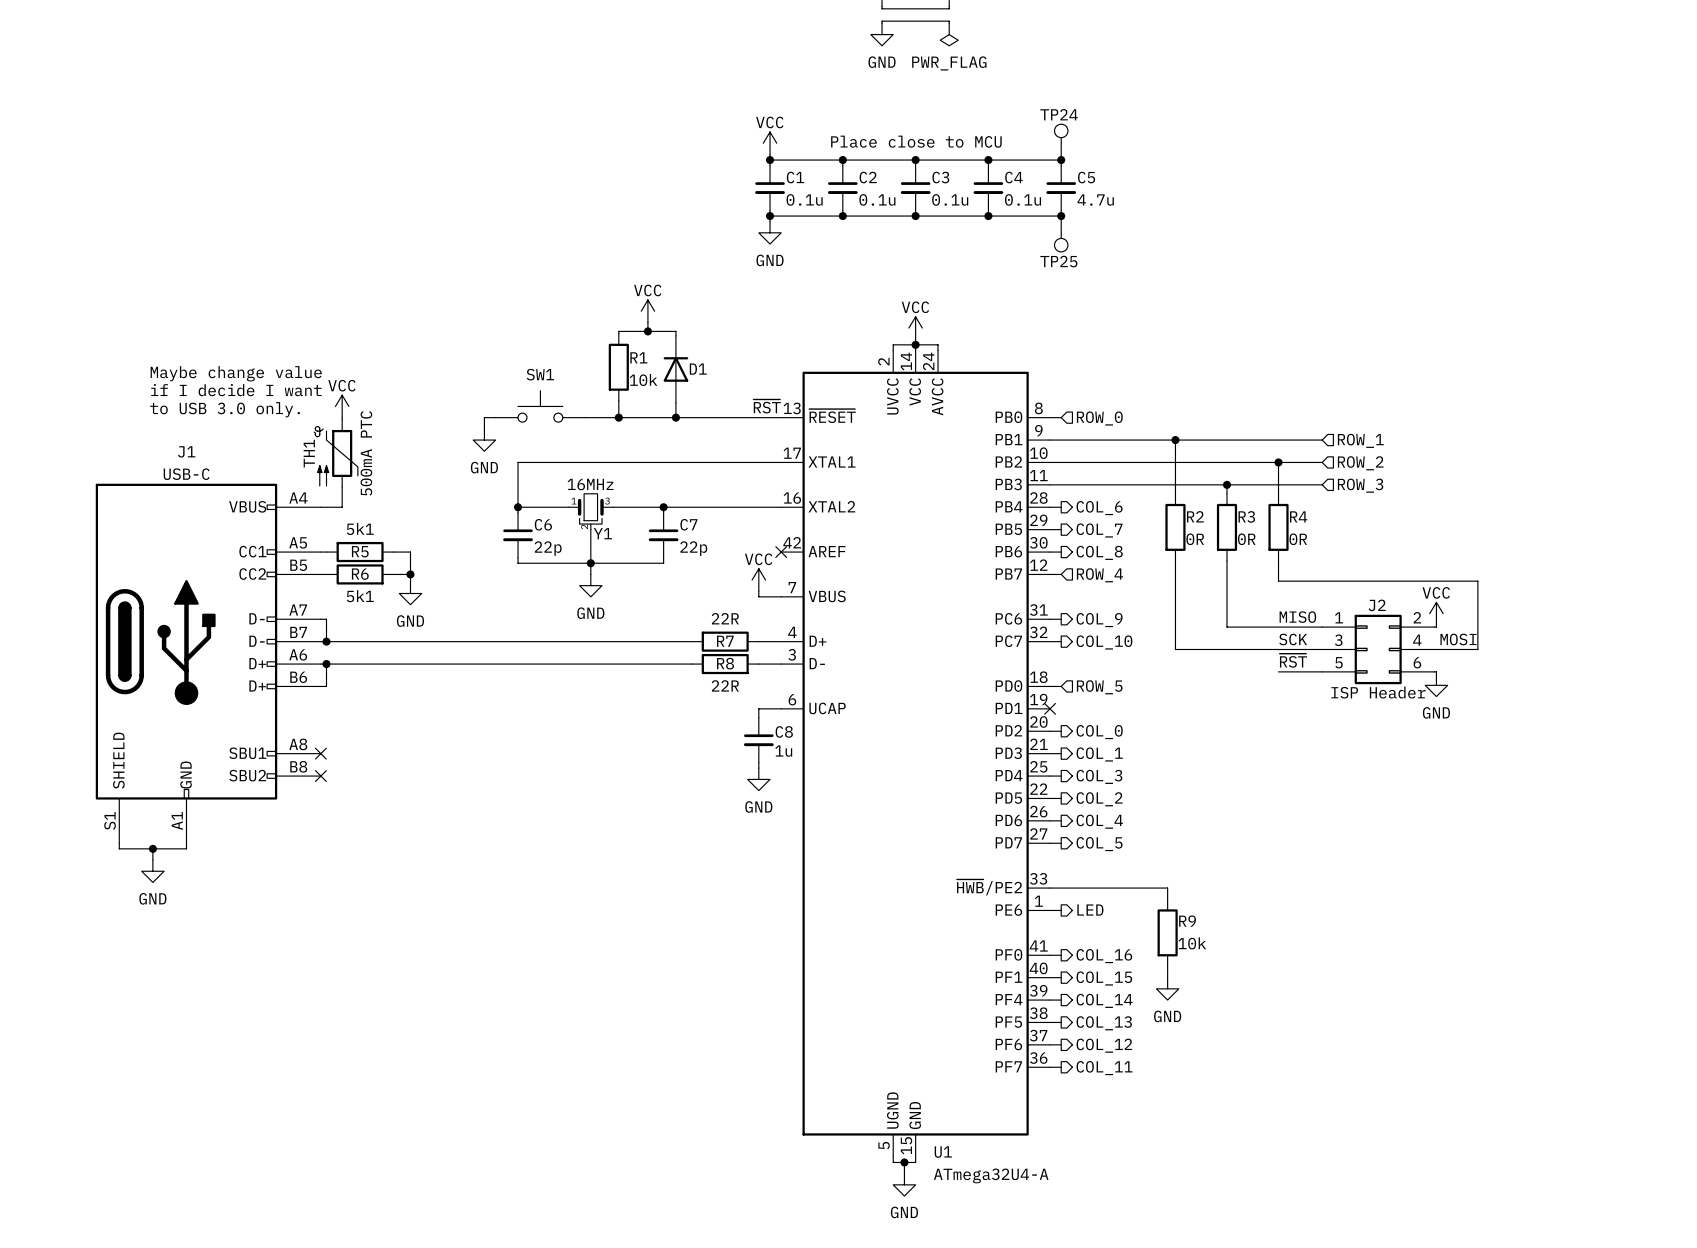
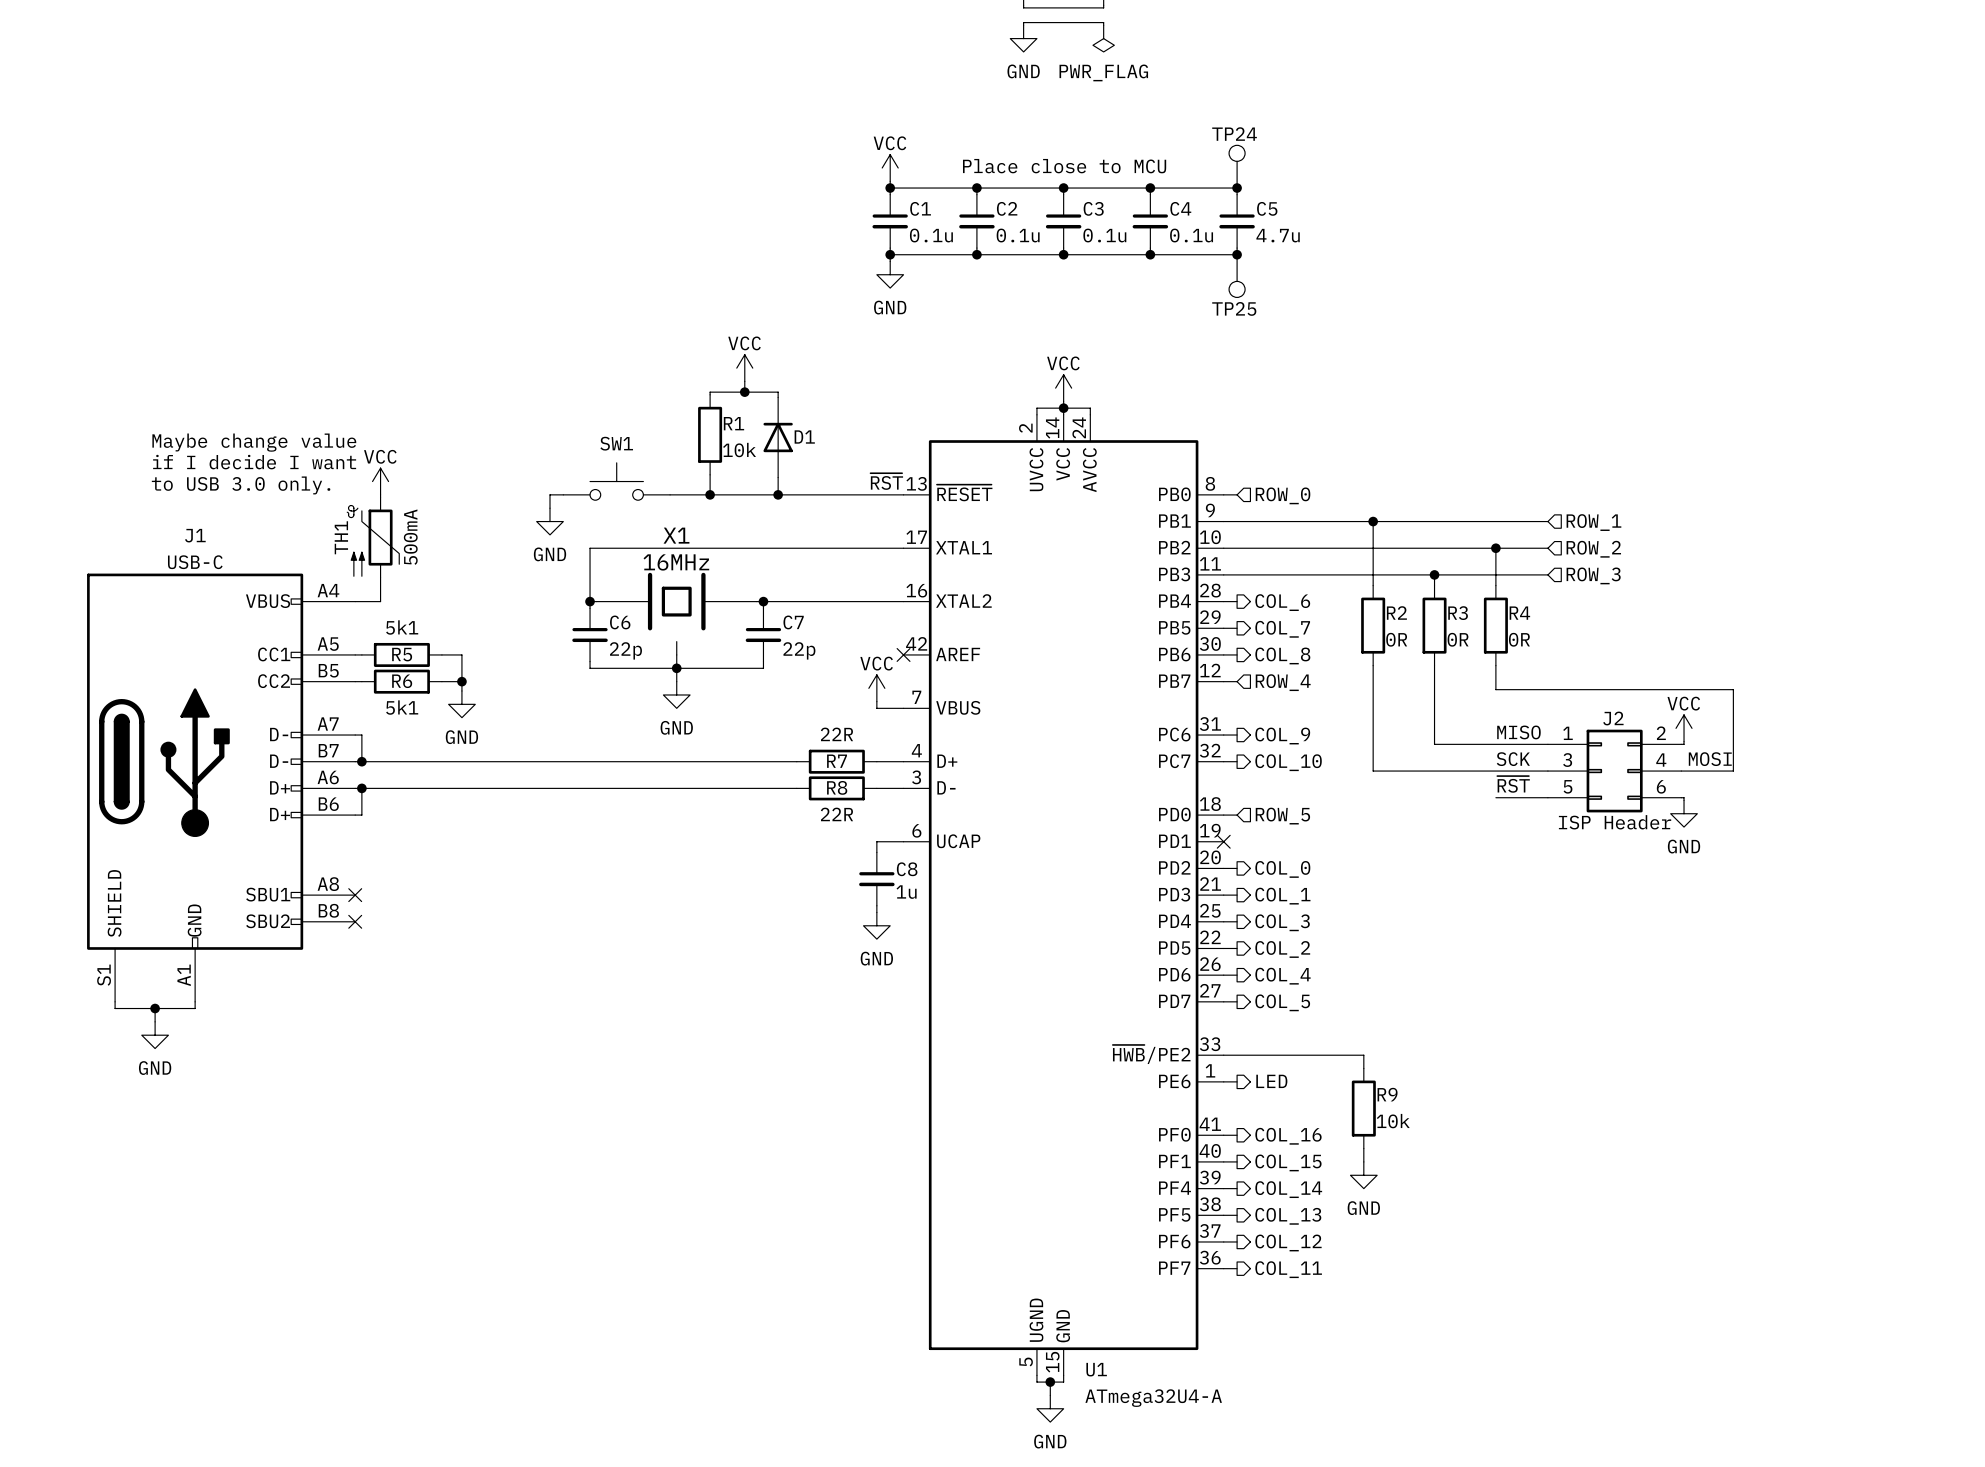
TH1 value: 500mA PTC (366, 453) -> 500mA (410, 537)
Y1: 16MHz (590, 511) -> none
X1: none -> 16MHz (676, 613)
wire: (590, 529) (590, 552) -> none

